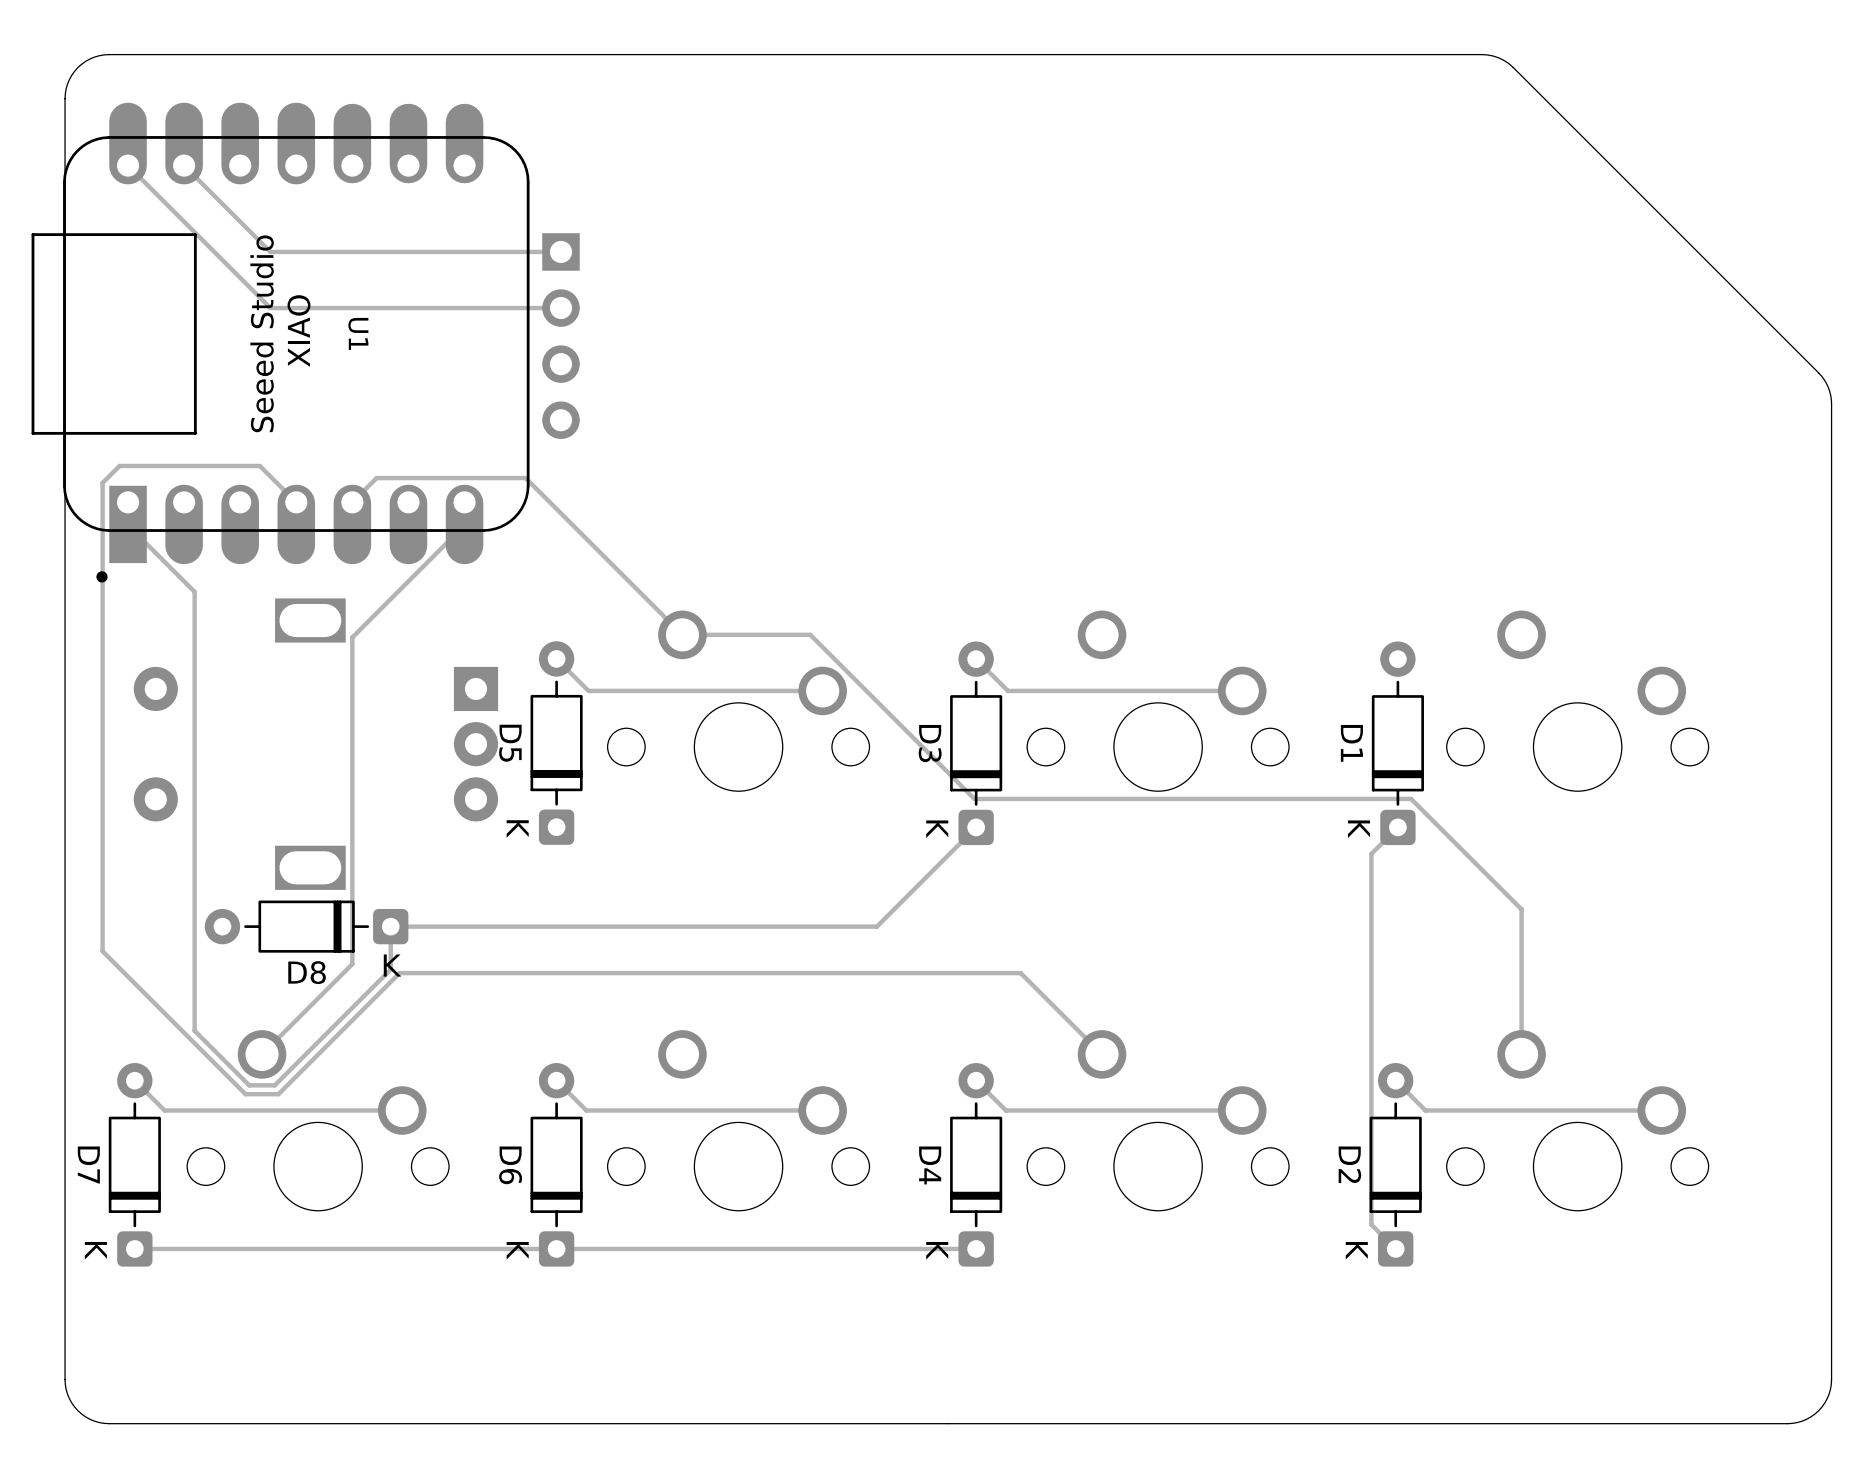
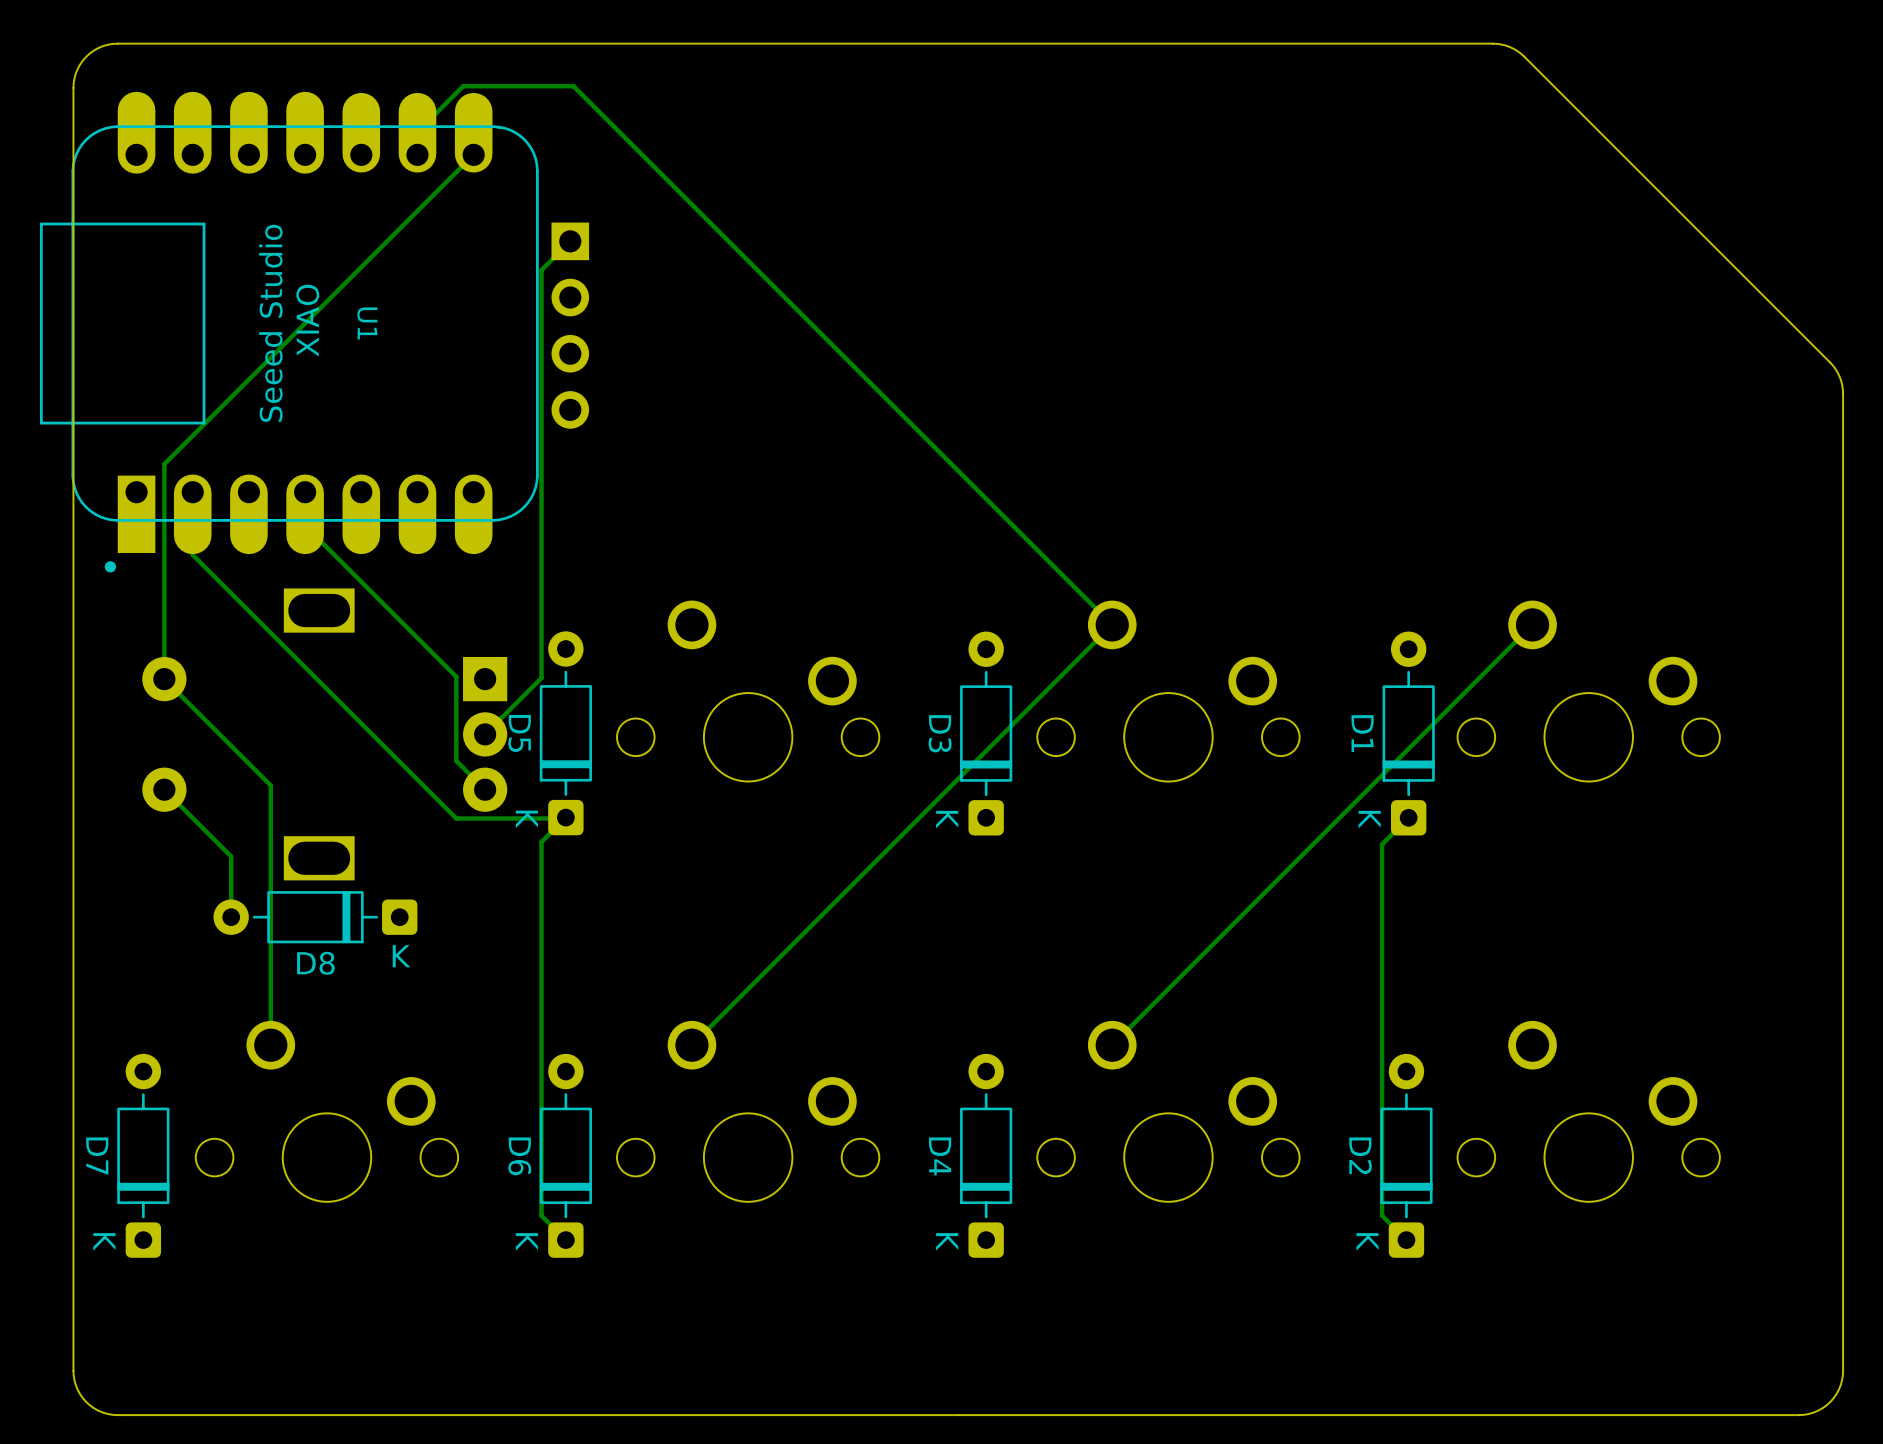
track: (128, 165) (270, 308) (561, 308) -> none
track: (184, 165) (270, 251) (561, 251) -> (485, 734) (541, 678) (541, 270) (570, 241)
track: none -> (417, 154) (417, 131) (463, 86) (573, 86) (1112, 624) (691, 1045)
track: (128, 502) (128, 525) (194, 591) (194, 1030) (249, 1085) (274, 1085) (390, 969) (390, 926) (876, 926) (976, 827) -> none
track: none -> (192, 492) (192, 554) (456, 818) (564, 818)
track: (296, 502) (259, 465) (119, 465) (102, 482) (102, 951) (245, 1094) (278, 1094) (399, 973) (1020, 973) (1102, 1054) -> (305, 492) (305, 525) (456, 676) (456, 760) (485, 789)
track: (352, 502) (376, 478) (525, 478) (682, 634) (810, 634) (974, 798) (1411, 798) (1521, 909) (1521, 1054) -> none
track: (464, 502) (464, 525) (352, 637) (352, 964) (262, 1054) -> (473, 154) (164, 464) (164, 679) (270, 785) (270, 1045)
track: none -> (1532, 624) (1112, 1045)
track: (556, 658) (588, 690) (822, 690) -> none
track: (976, 659) (1007, 690) (1242, 690) -> none
track: none -> (164, 789) (231, 856) (231, 917)
track: none -> (565, 817) (541, 841) (541, 1215) (565, 1240)
track: (134, 1080) (164, 1110) (402, 1110) -> none
track: (556, 1080) (586, 1110) (822, 1110) -> none
track: (976, 1080) (1005, 1110) (1242, 1110) -> none
track: (1395, 1080) (1425, 1110) (1661, 1110) -> none
track: (976, 1248) (134, 1248) -> none

